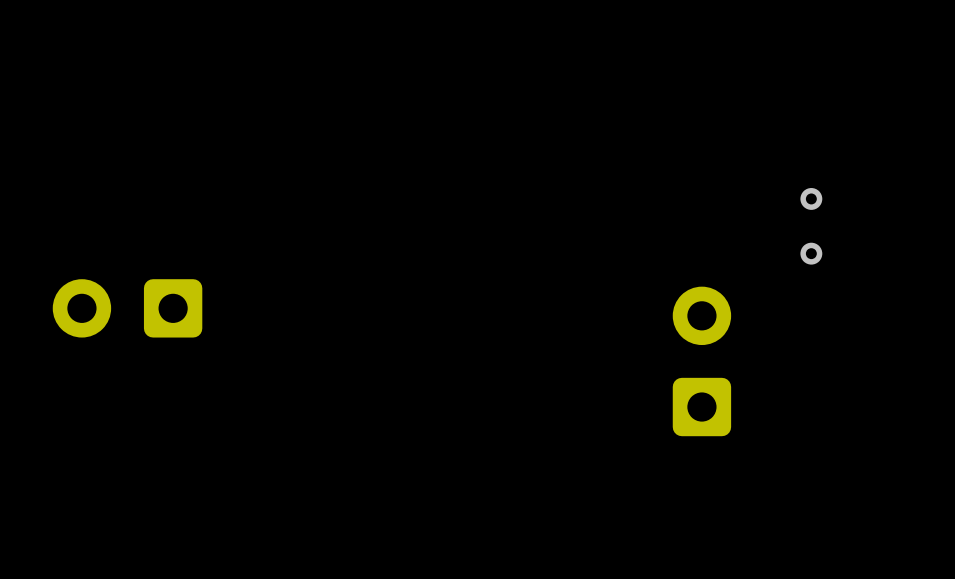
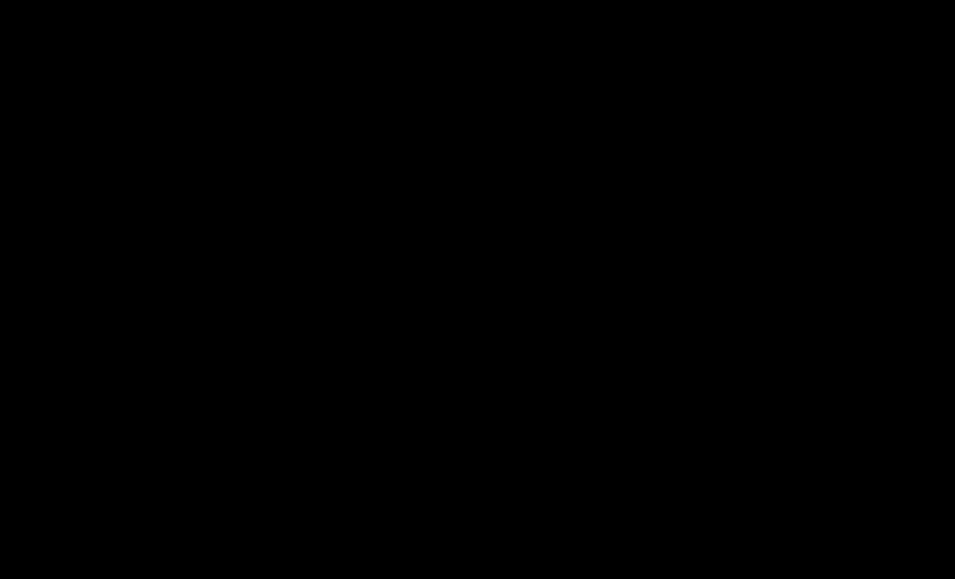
via: (811, 198) -> none
via: (811, 253) -> none
part: (127, 308) -> none
part: (701, 361) -> none

